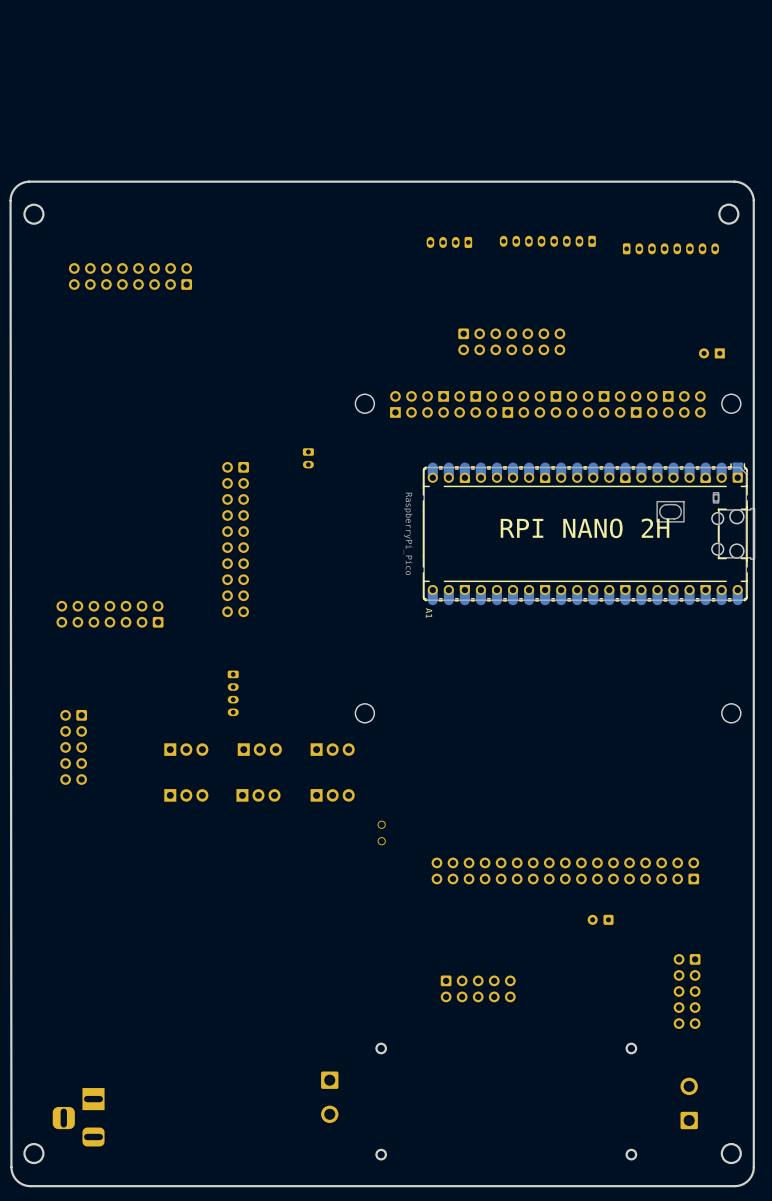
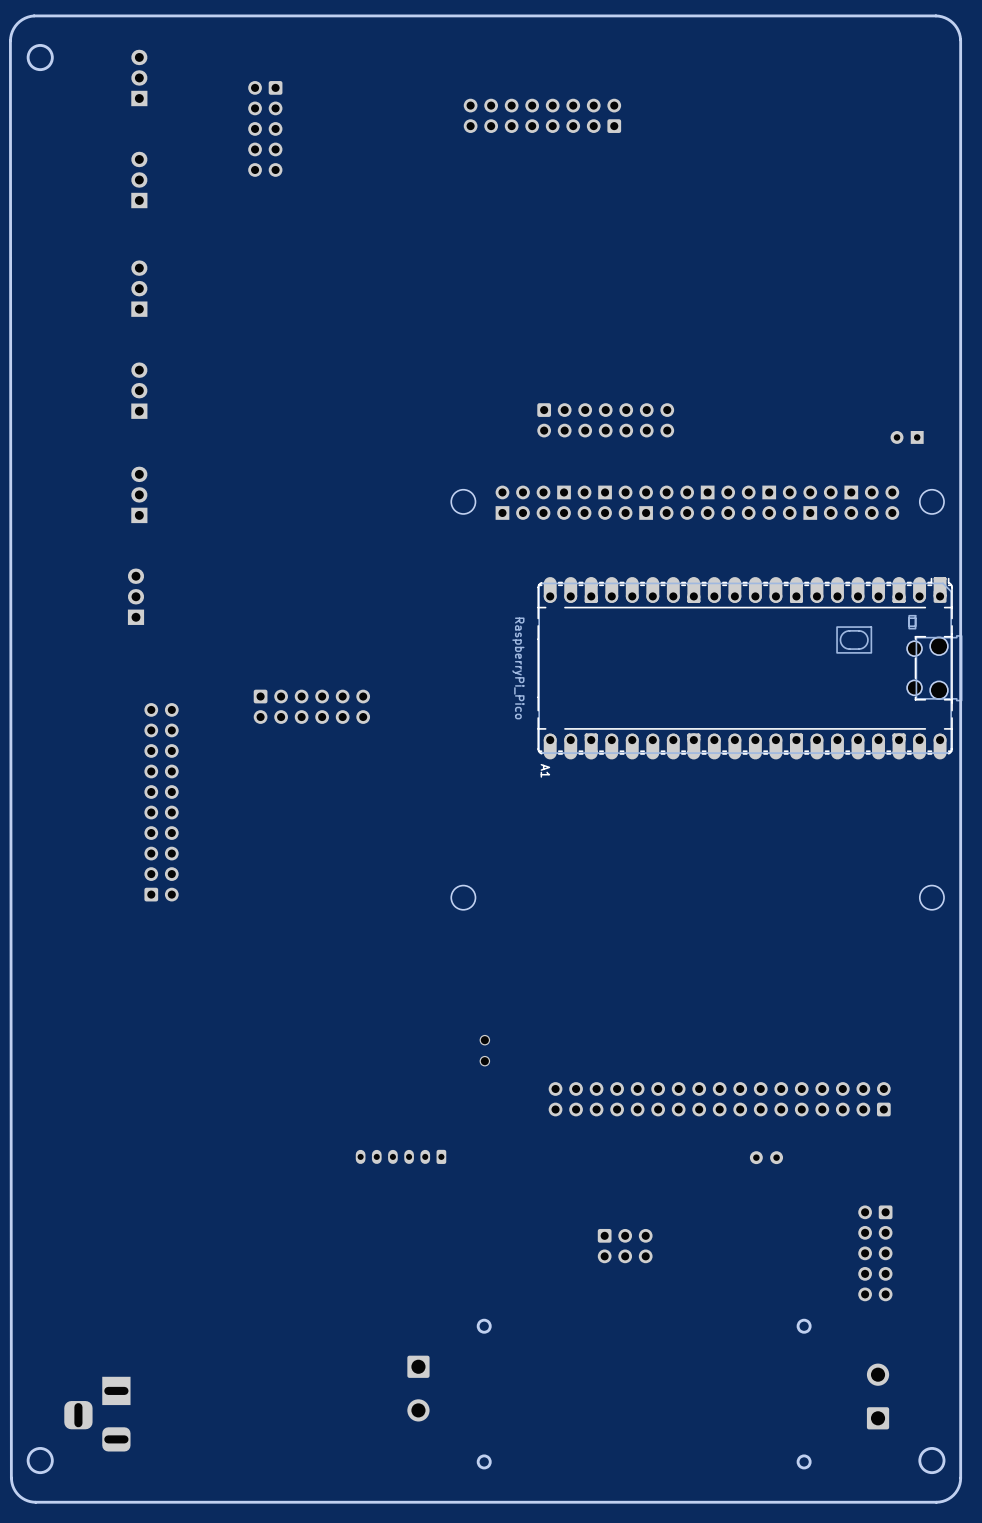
board edge: none -> (960, 39) (958, 30) (953, 23) (945, 17) (935, 15) (34, 15) (24, 18) (17, 23) (12, 31) (10, 40)
part: none -> (139, 77)
part: none -> (542, 115)
part: none -> (265, 128)
part: none -> (139, 179)
board edge: (753, 200) (753, 1167) -> (960, 39) (960, 1478)
board edge: (753, 200) (747, 187) (734, 181) (29, 181) (19, 184) (14, 189) (10, 200) (11, 1167) -> (10, 40) (11, 1478)
round board edge: [718, 203, 740, 225] -> none
round board edge position: (33, 214) -> (40, 57)
part: none -> (139, 288)
part: (547, 241) -> none
part: (449, 242) -> none
part: (670, 248) -> none
part: (130, 276) -> none
part: none -> (139, 390)
part position: (511, 341) -> (605, 420)
part: none -> (139, 494)
part: (308, 458) -> none
part: none -> (136, 596)
text: RPI NANO 2H (585, 528) -> none
part rotation: 0° (235, 539) -> 180° (161, 802)
part position: (235, 539) -> (161, 802)
part: none -> (311, 706)
part: (109, 614) -> none
part: (233, 693) -> none
part: (73, 747) -> none
part: (186, 749) -> none
part: (259, 749) -> none
part: (332, 749) -> none
part: (186, 795) -> none
part: (258, 795) -> none
part: (332, 795) -> none
part footprint: [587, 914, 614, 925] -> [749, 1151, 784, 1165]
part: none -> (401, 1156)
part: none -> (625, 1246)
part: (478, 988) -> none

